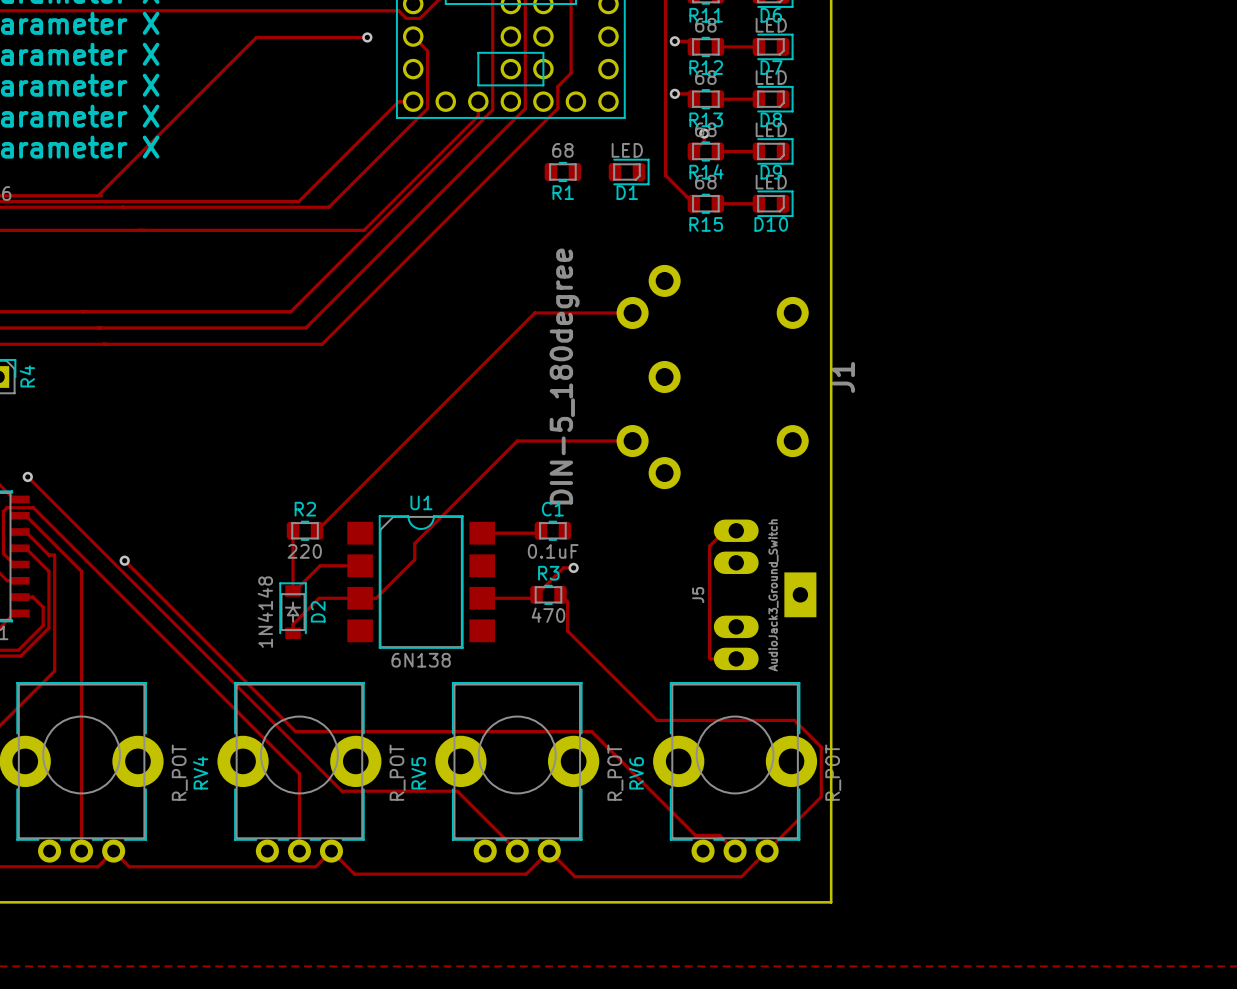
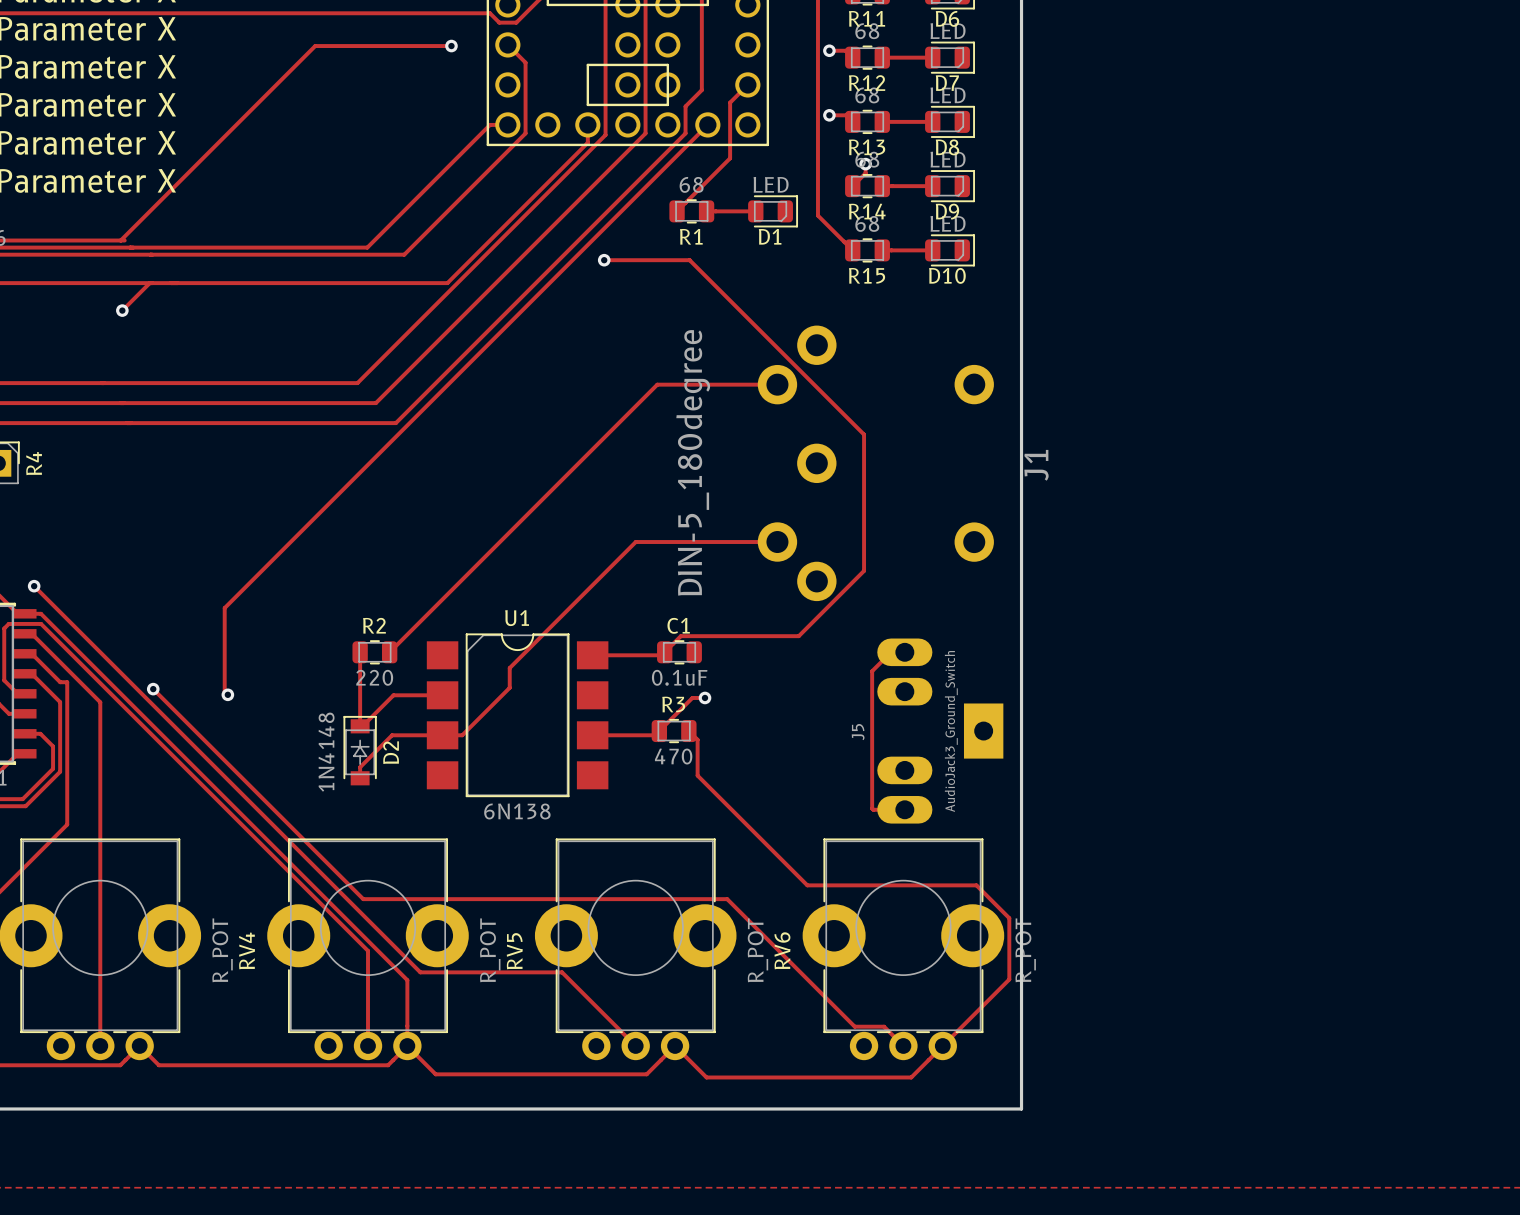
track: none -> (747, 84) (730, 102) (730, 158) (677, 211)
track: none -> (707, 124) (224, 608) (224, 691) (227, 694)
track: none -> (706, 211) (755, 211)
track: none -> (604, 260) (689, 260) (864, 434) (864, 570) (798, 636) (680, 636) (664, 652)
via: none -> (604, 260)
track: none -> (149, 283) (122, 310)
via: none -> (122, 310)
track: none -> (24, 613) (40, 613) (407, 980) (407, 1045)
via: none -> (227, 694)

